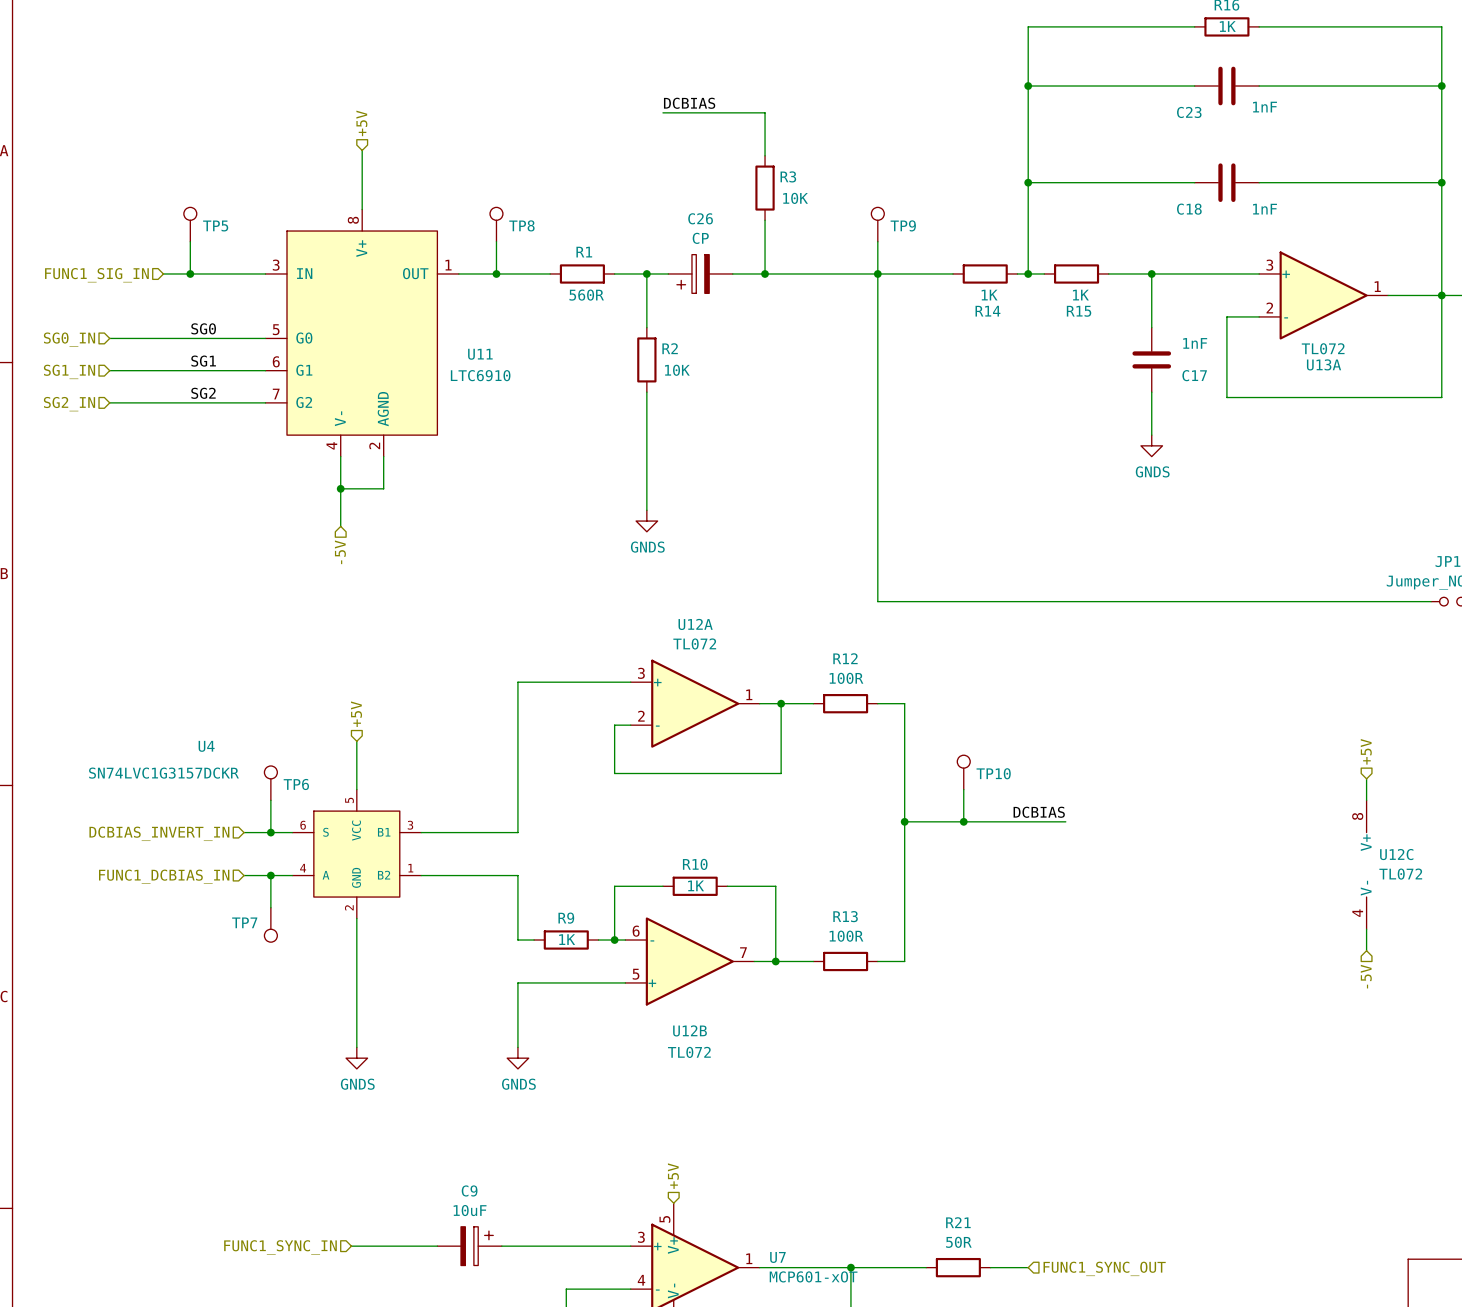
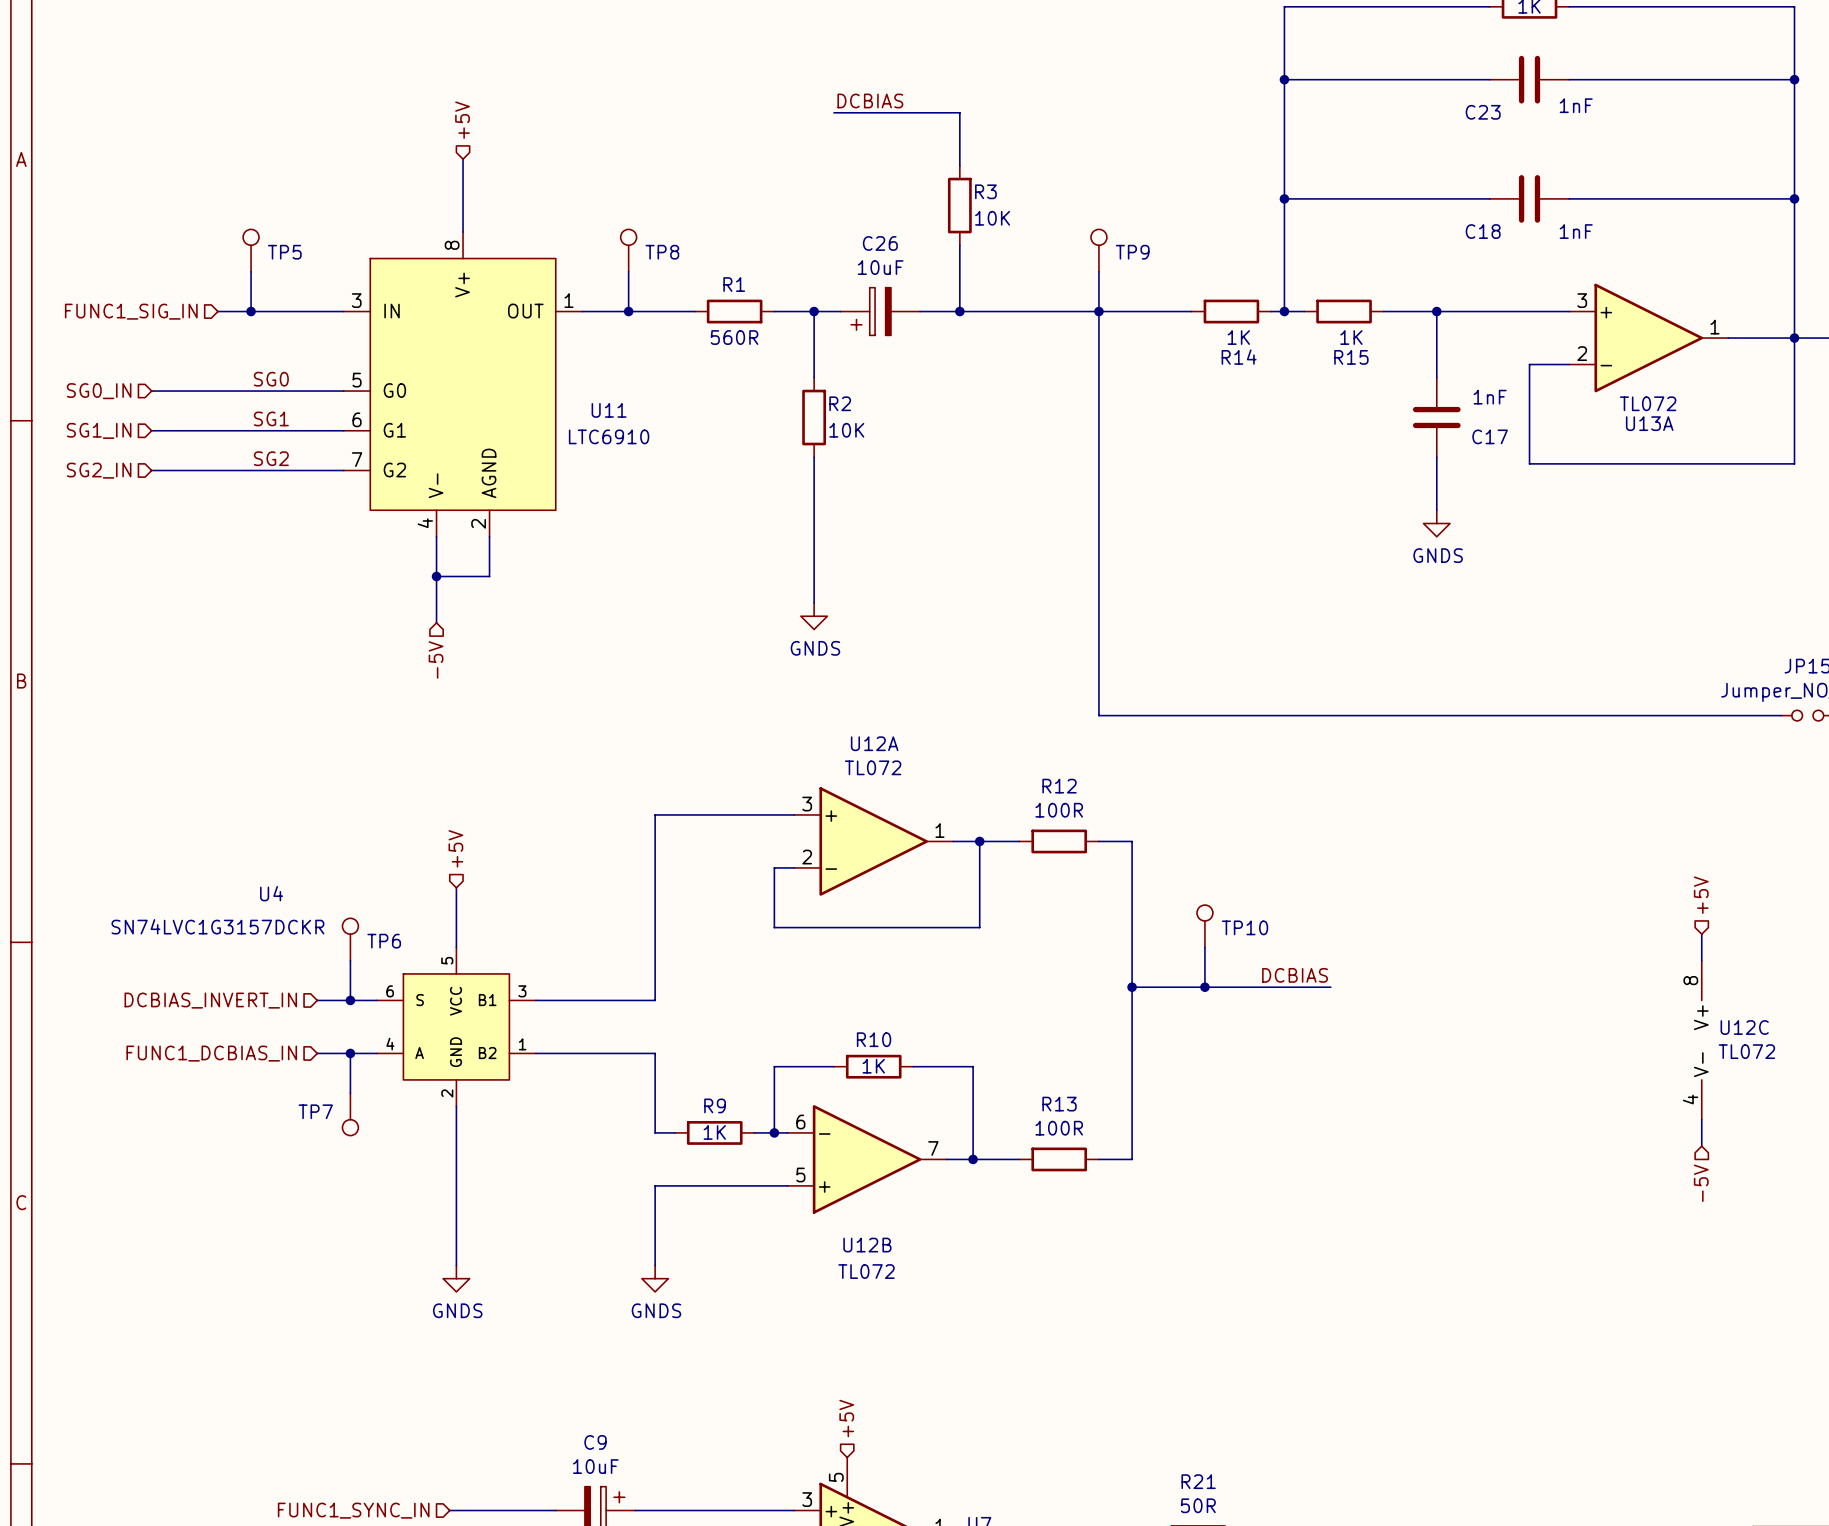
C26 value: CP (700, 238) -> 10uF (880, 267)

